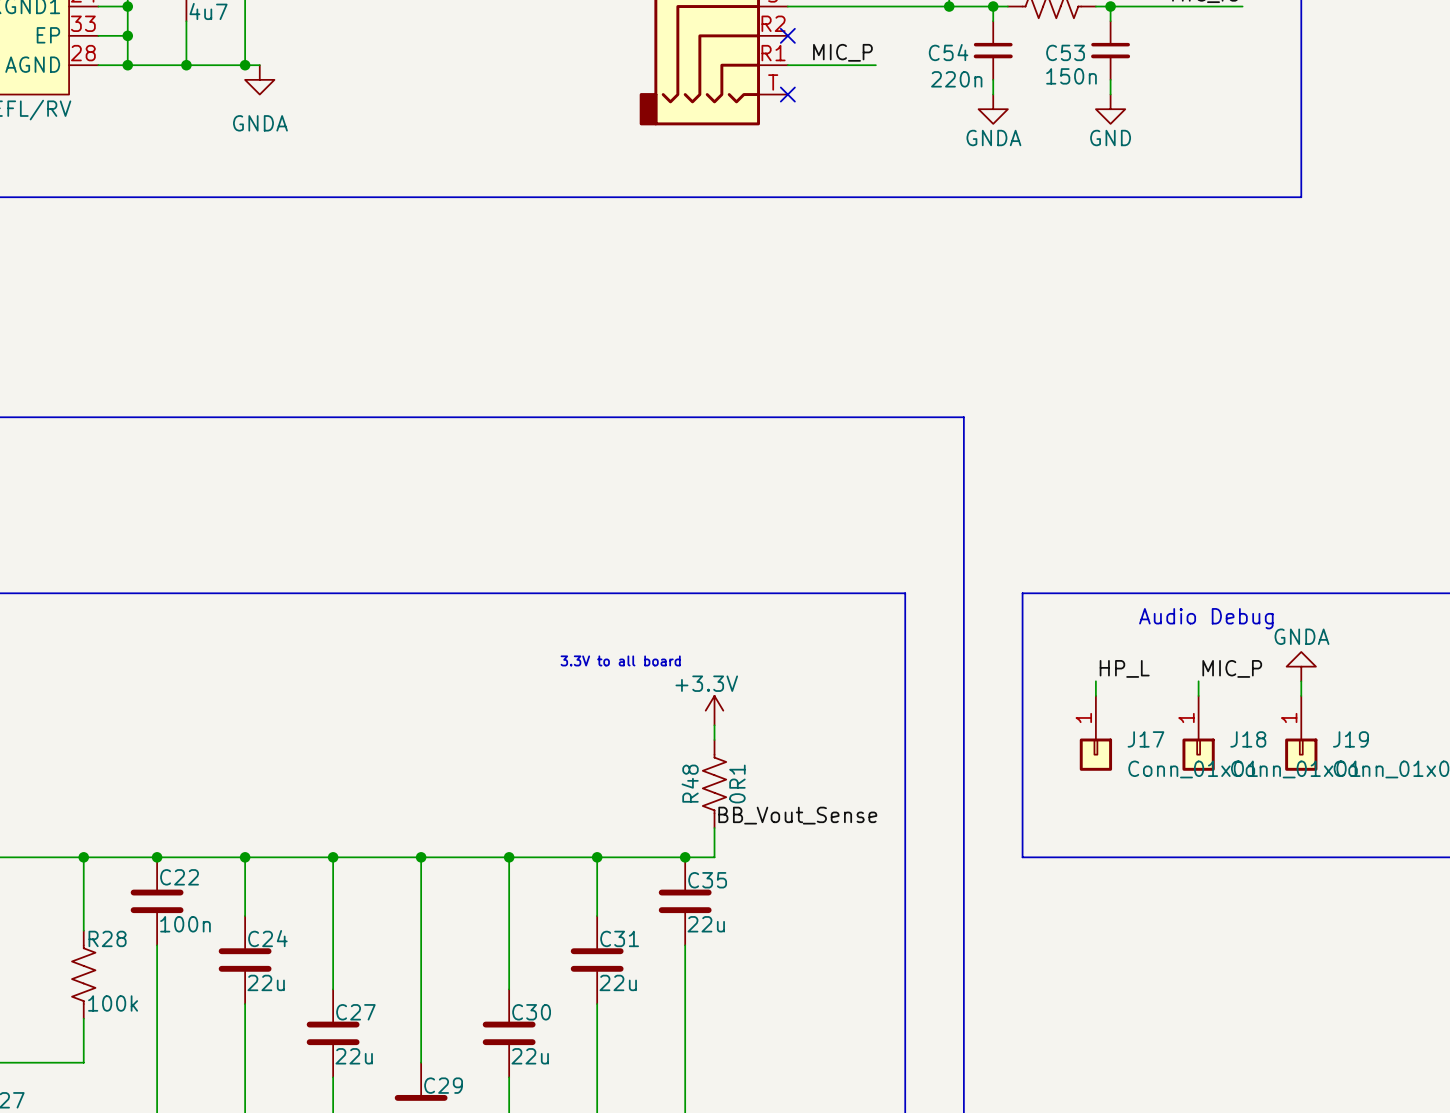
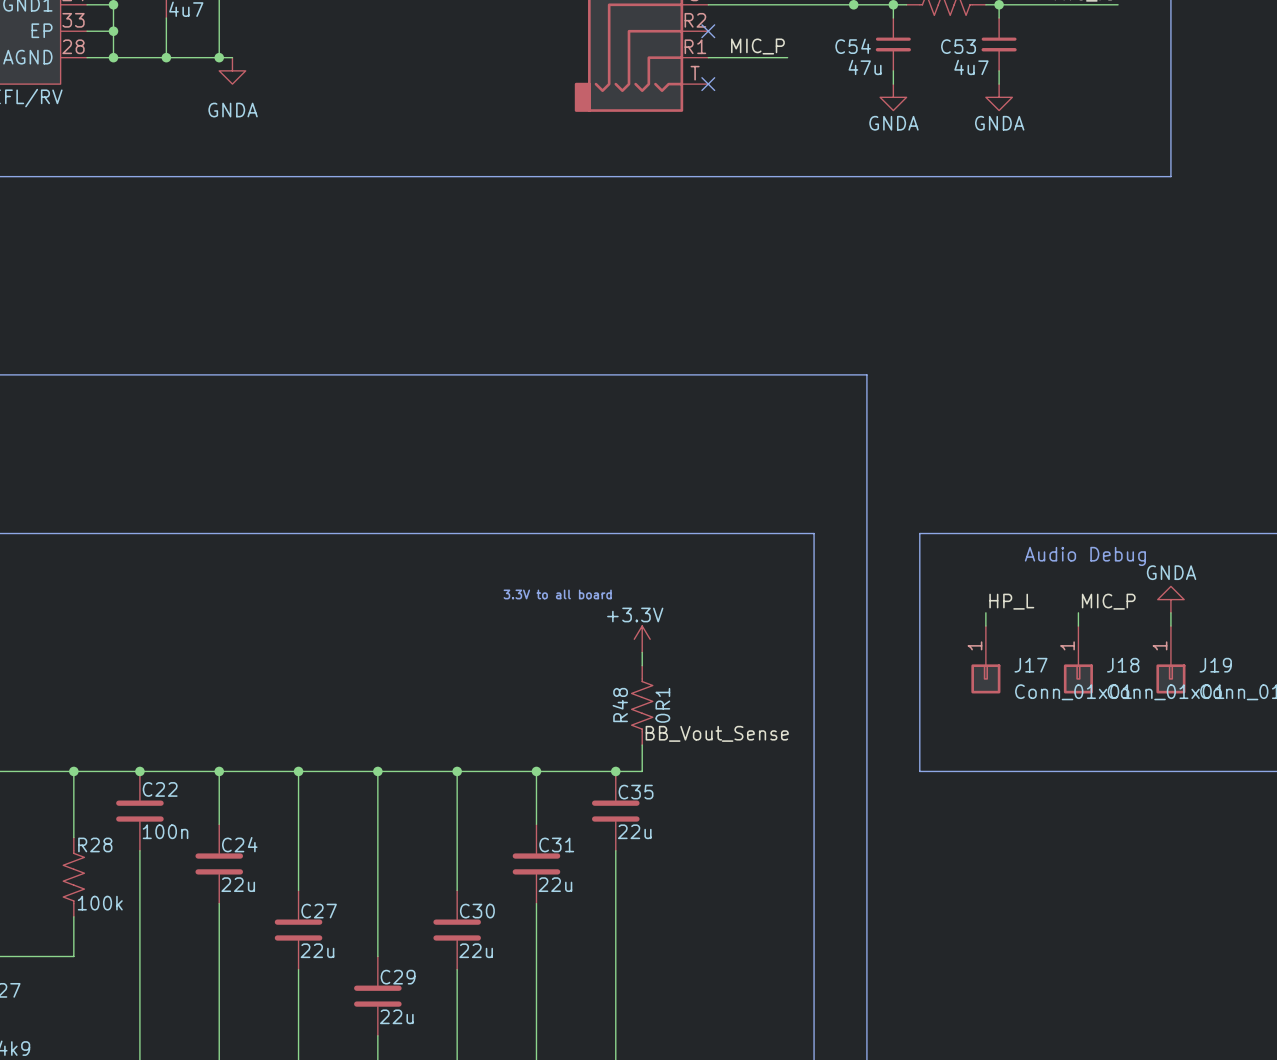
C53 value: 150n (1071, 76) -> 4u7 (971, 67)
C54 value: 220n (956, 79) -> 47u (865, 67)
power symbol: GND (1110, 109) -> GNDA (999, 97)

